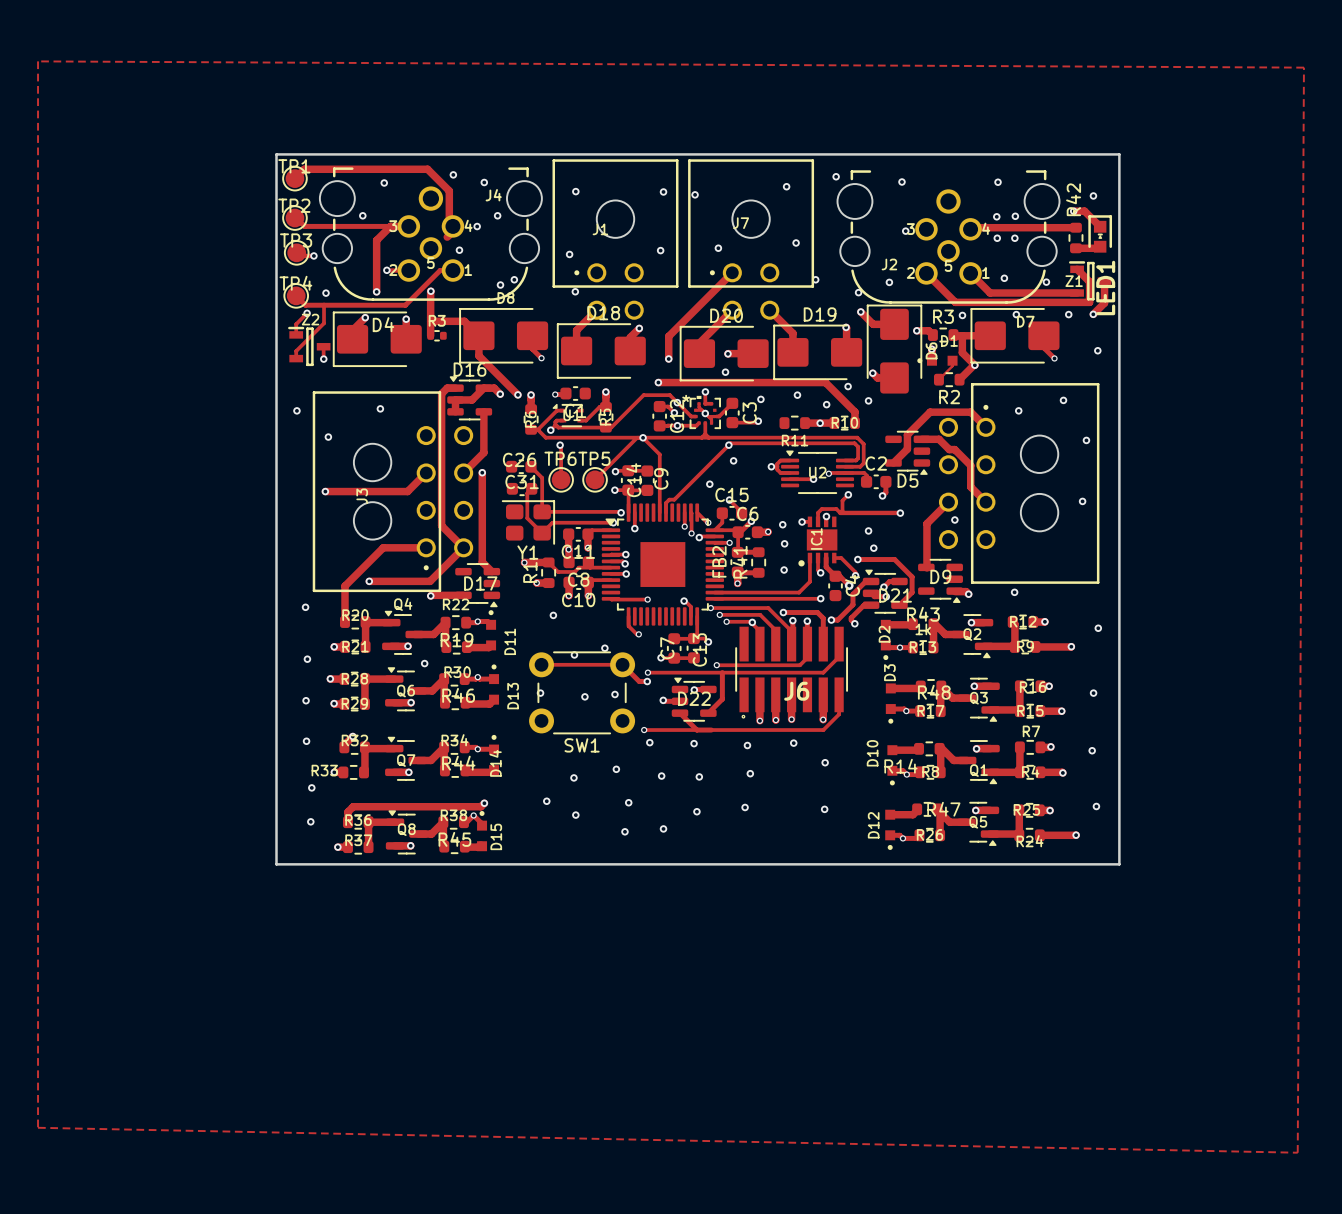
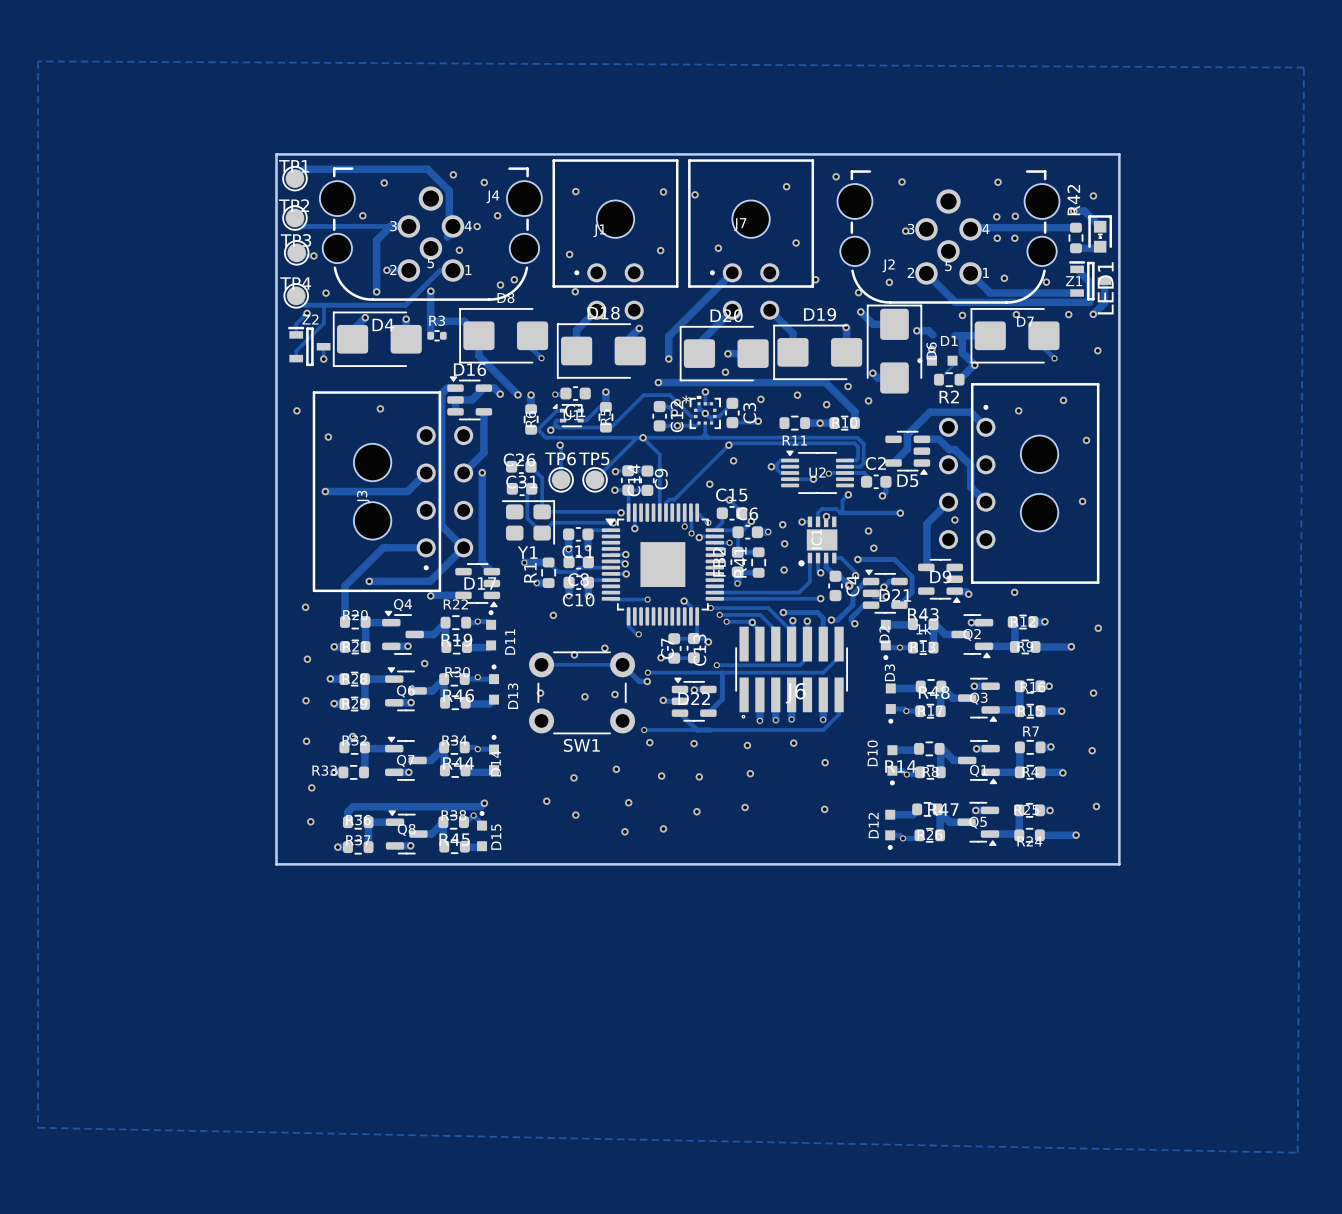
R3: (943, 335) -> none

